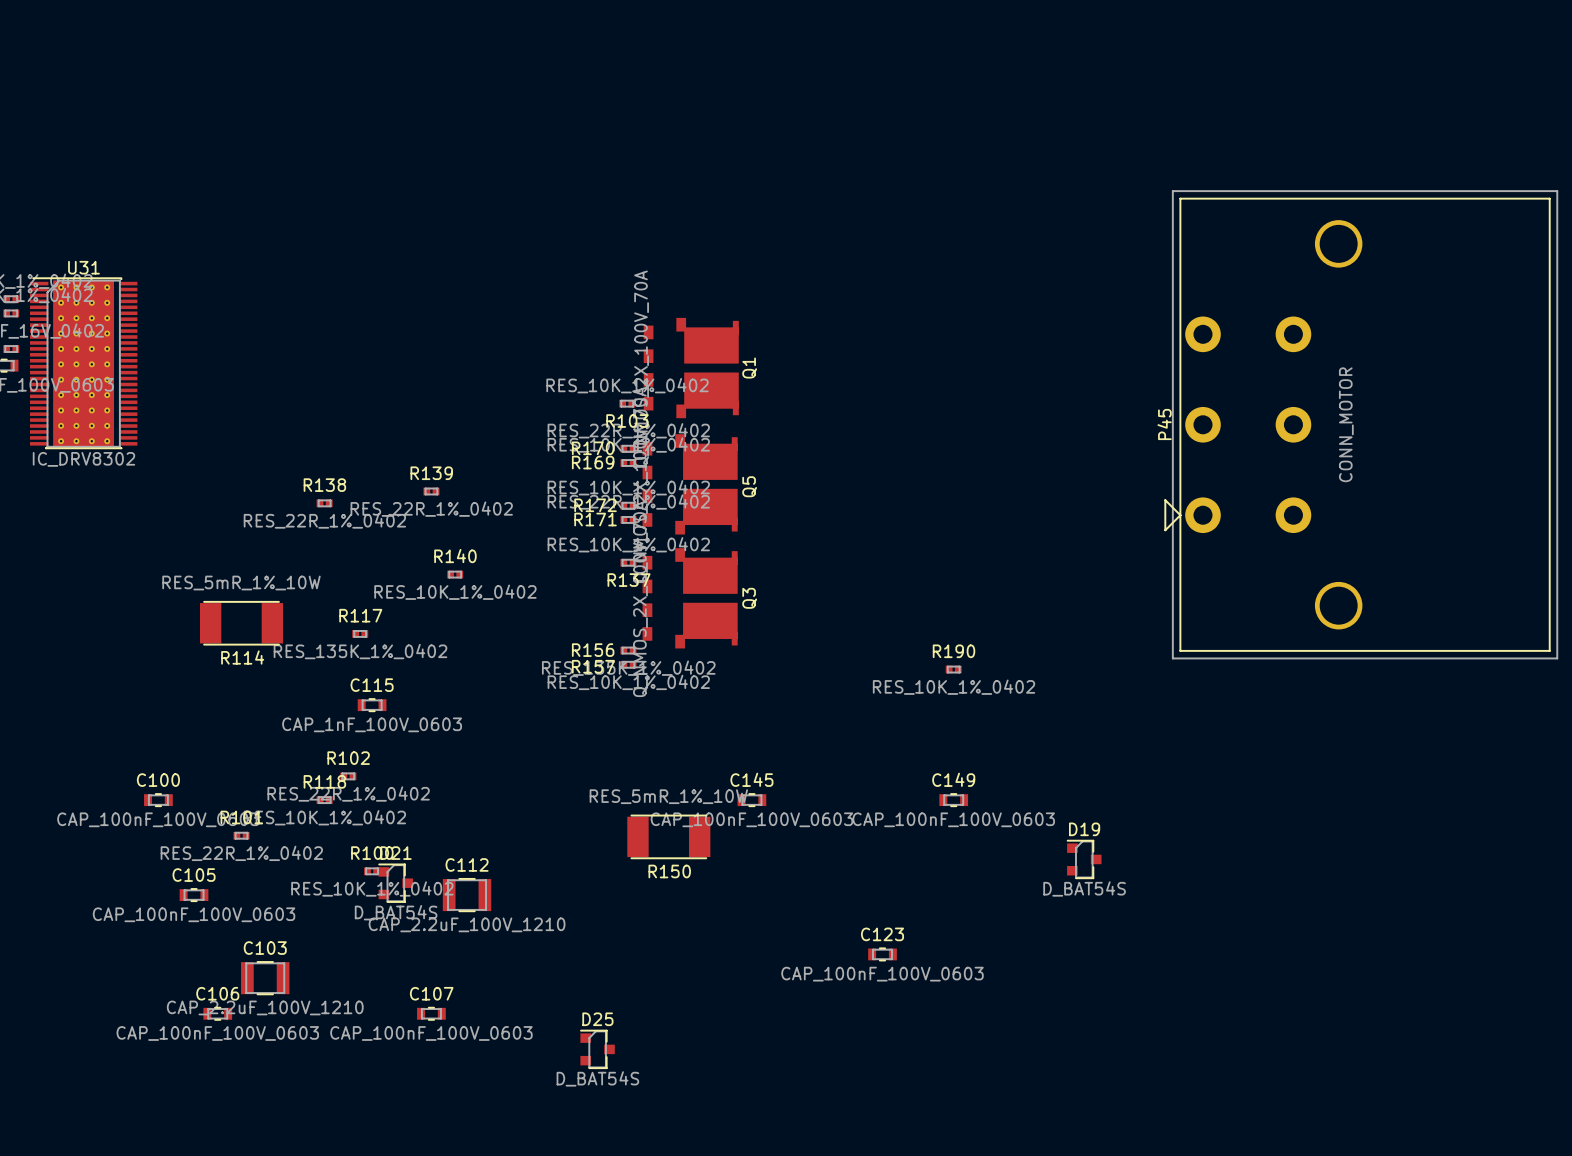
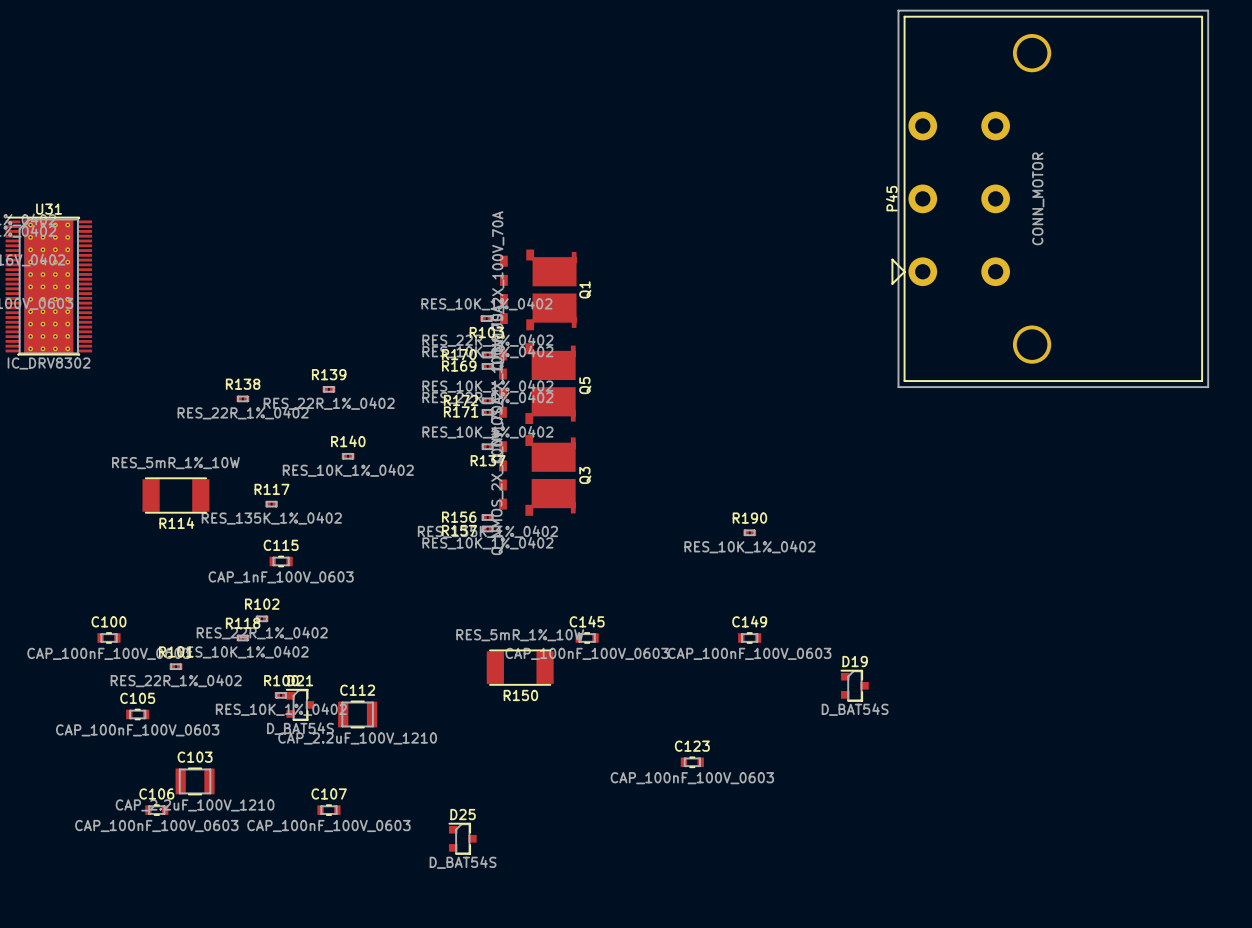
P45 position: (1361, 424) -> (1050, 198)

